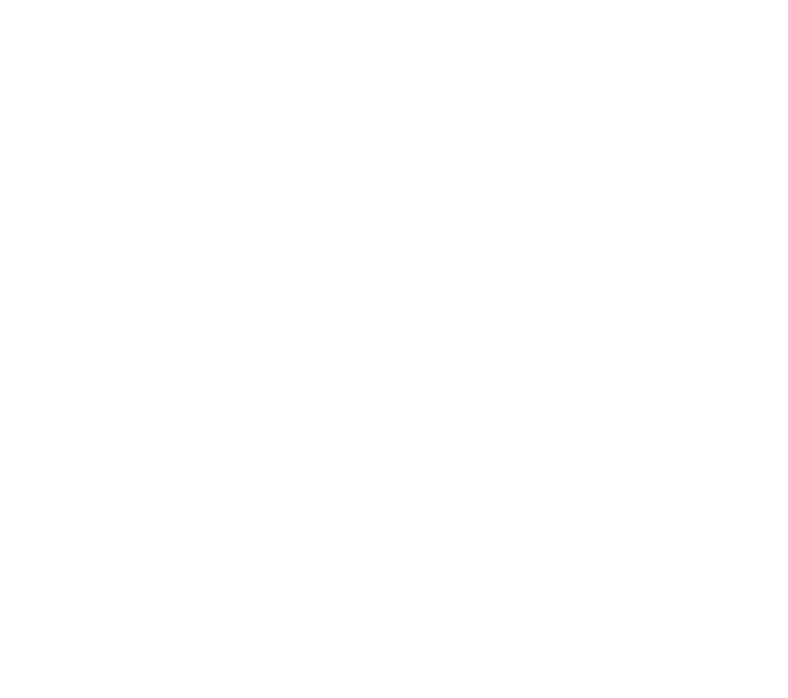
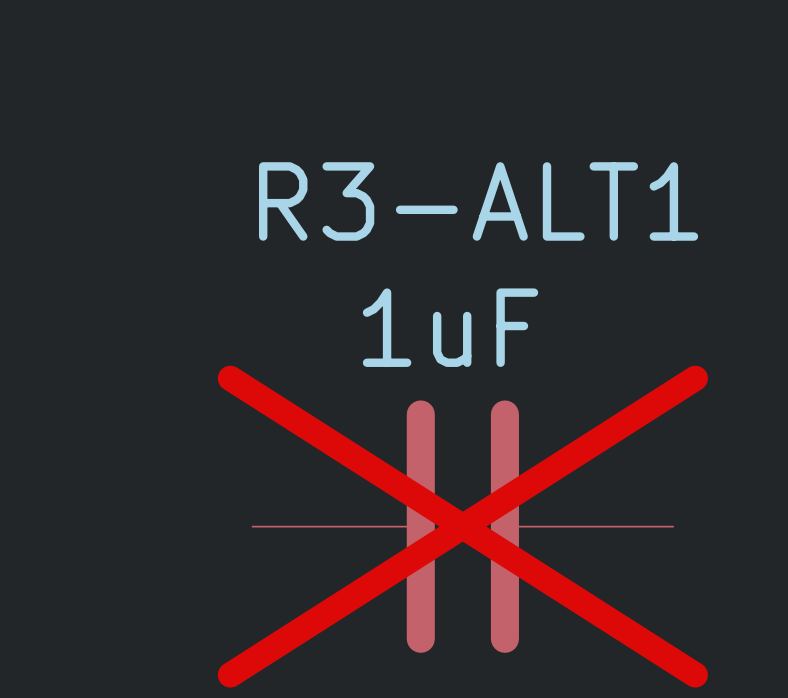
R3-ALT1: none -> 1uF (462, 526)

